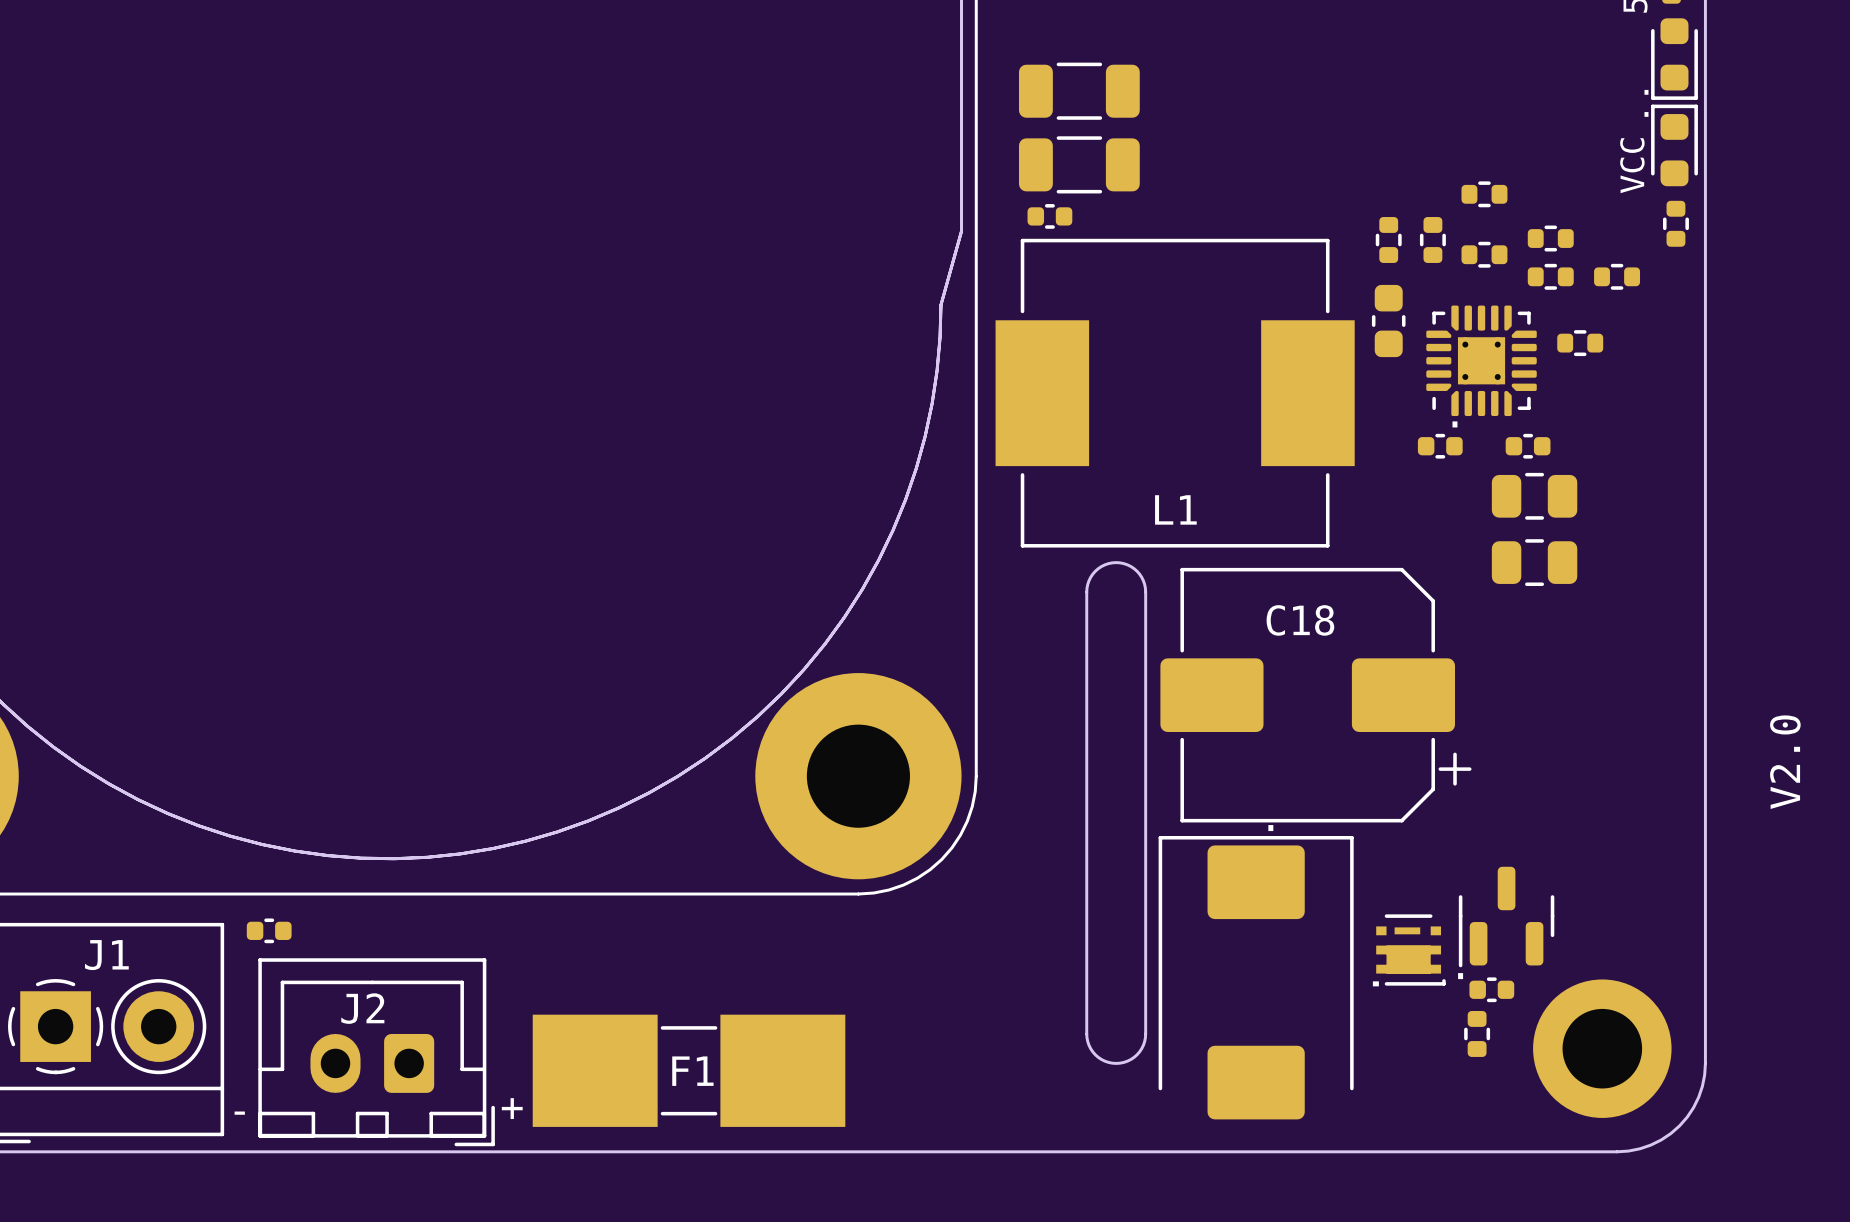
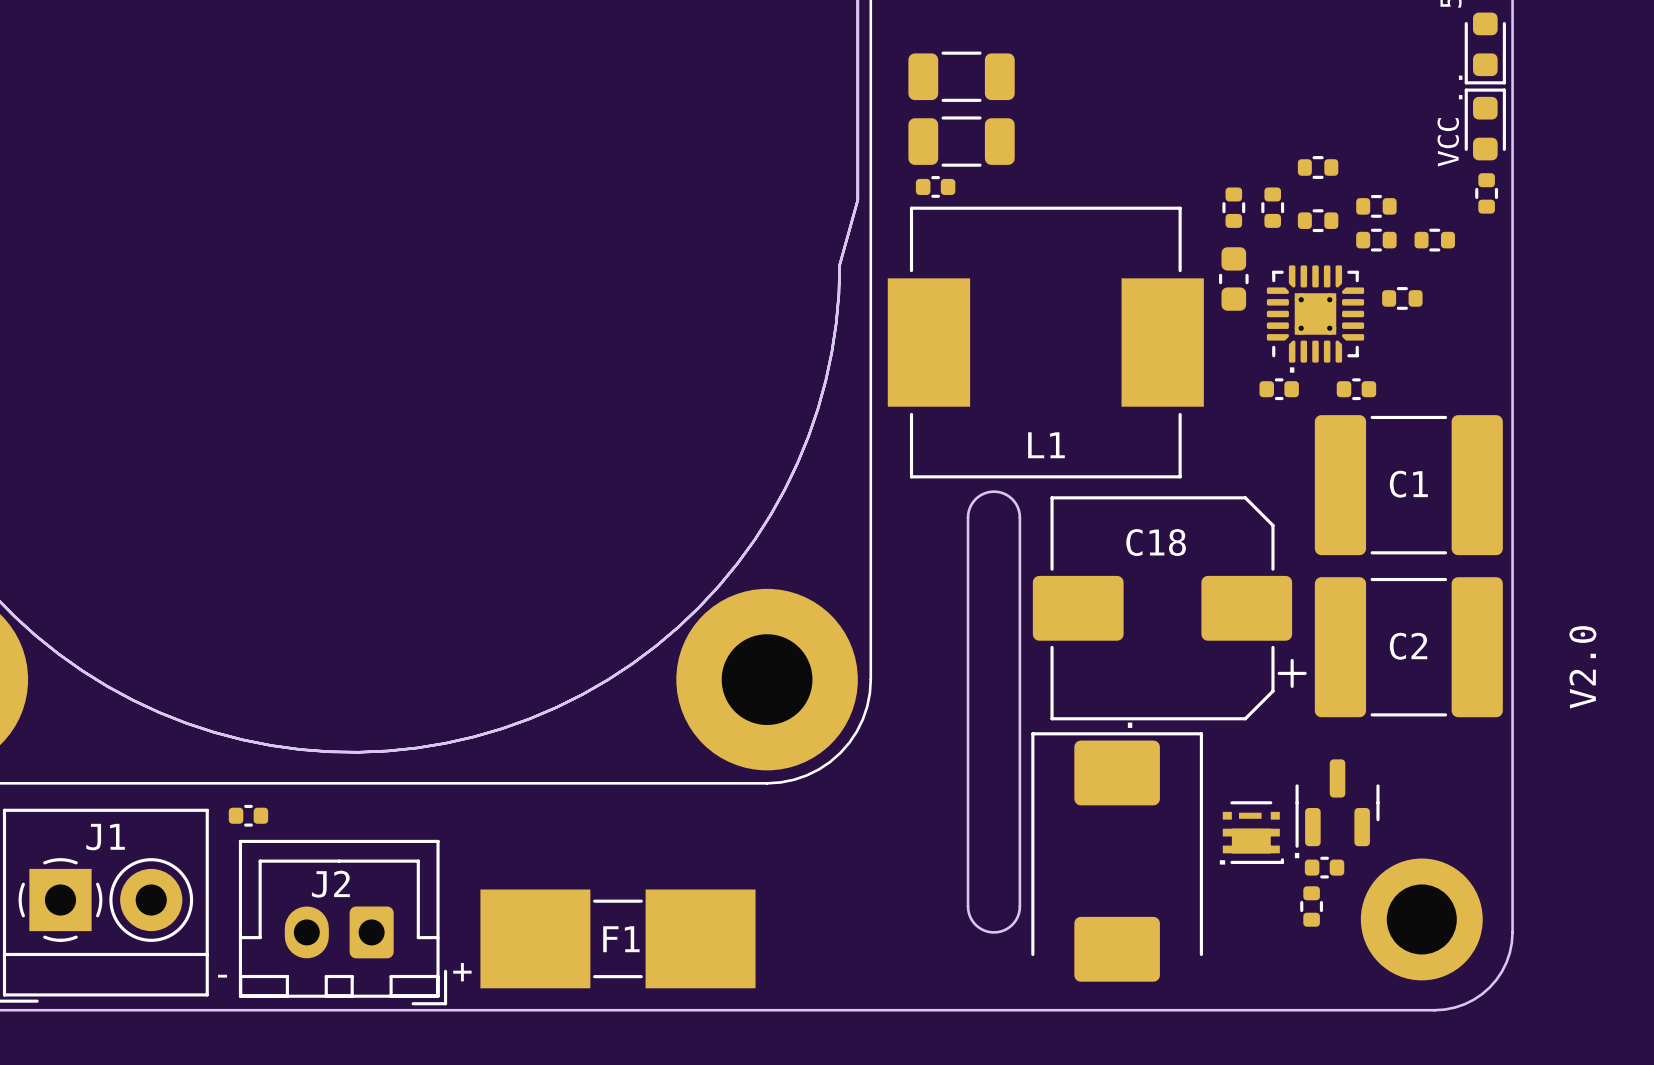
part: (1534, 496) -> none
C1: none -> (1408, 485)
part: (1534, 562) -> none
C2: none -> (1408, 647)

